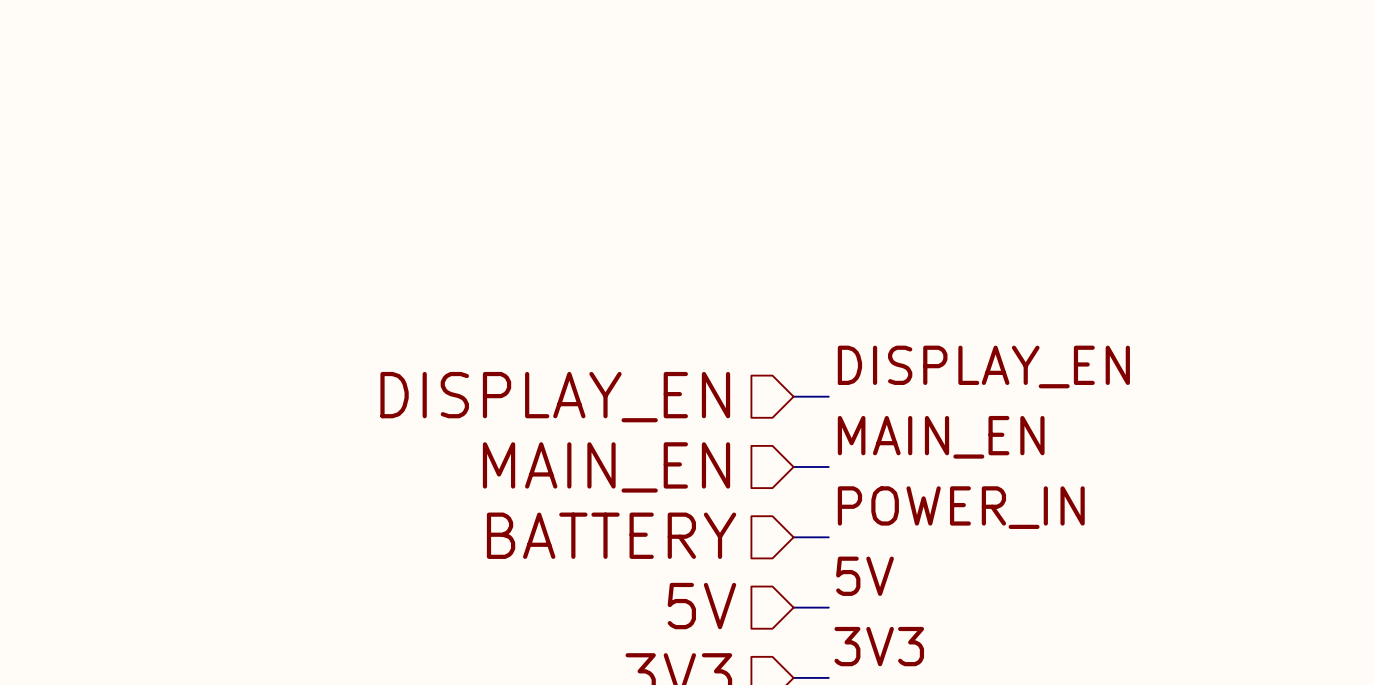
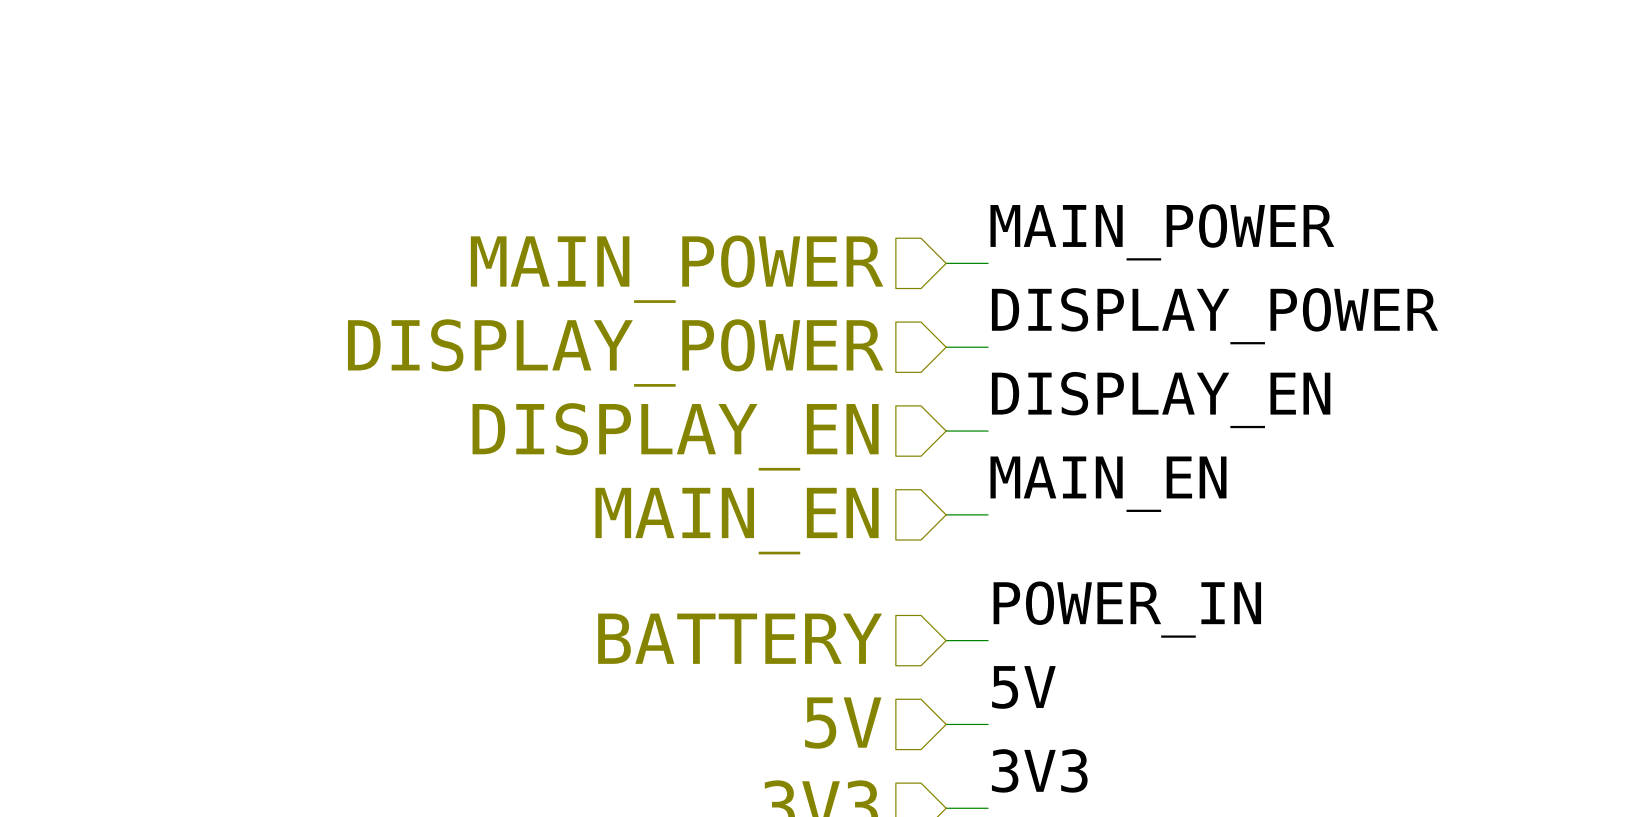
label: none -> MAIN_POWER (1162, 232)
wire: none -> (946, 263) (988, 263)
hierarchical label: none -> MAIN_POWER (677, 269)
label: none -> DISPLAY_POWER (1214, 316)
hierarchical label: none -> DISPLAY_POWER (615, 353)
wire: none -> (946, 347) (988, 347)
label position: DISPLAY_EN (983, 366) -> DISPLAY_EN (1161, 400)
wire: (793, 396) (828, 396) -> (946, 431) (988, 431)
hierarchical label position: DISPLAY_EN (555, 397) -> DISPLAY_EN (675, 436)
label position: MAIN_EN (941, 437) -> MAIN_EN (1108, 484)
hierarchical label position: MAIN_EN (606, 467) -> MAIN_EN (737, 521)
wire: (793, 467) (828, 467) -> (946, 514) (988, 514)

